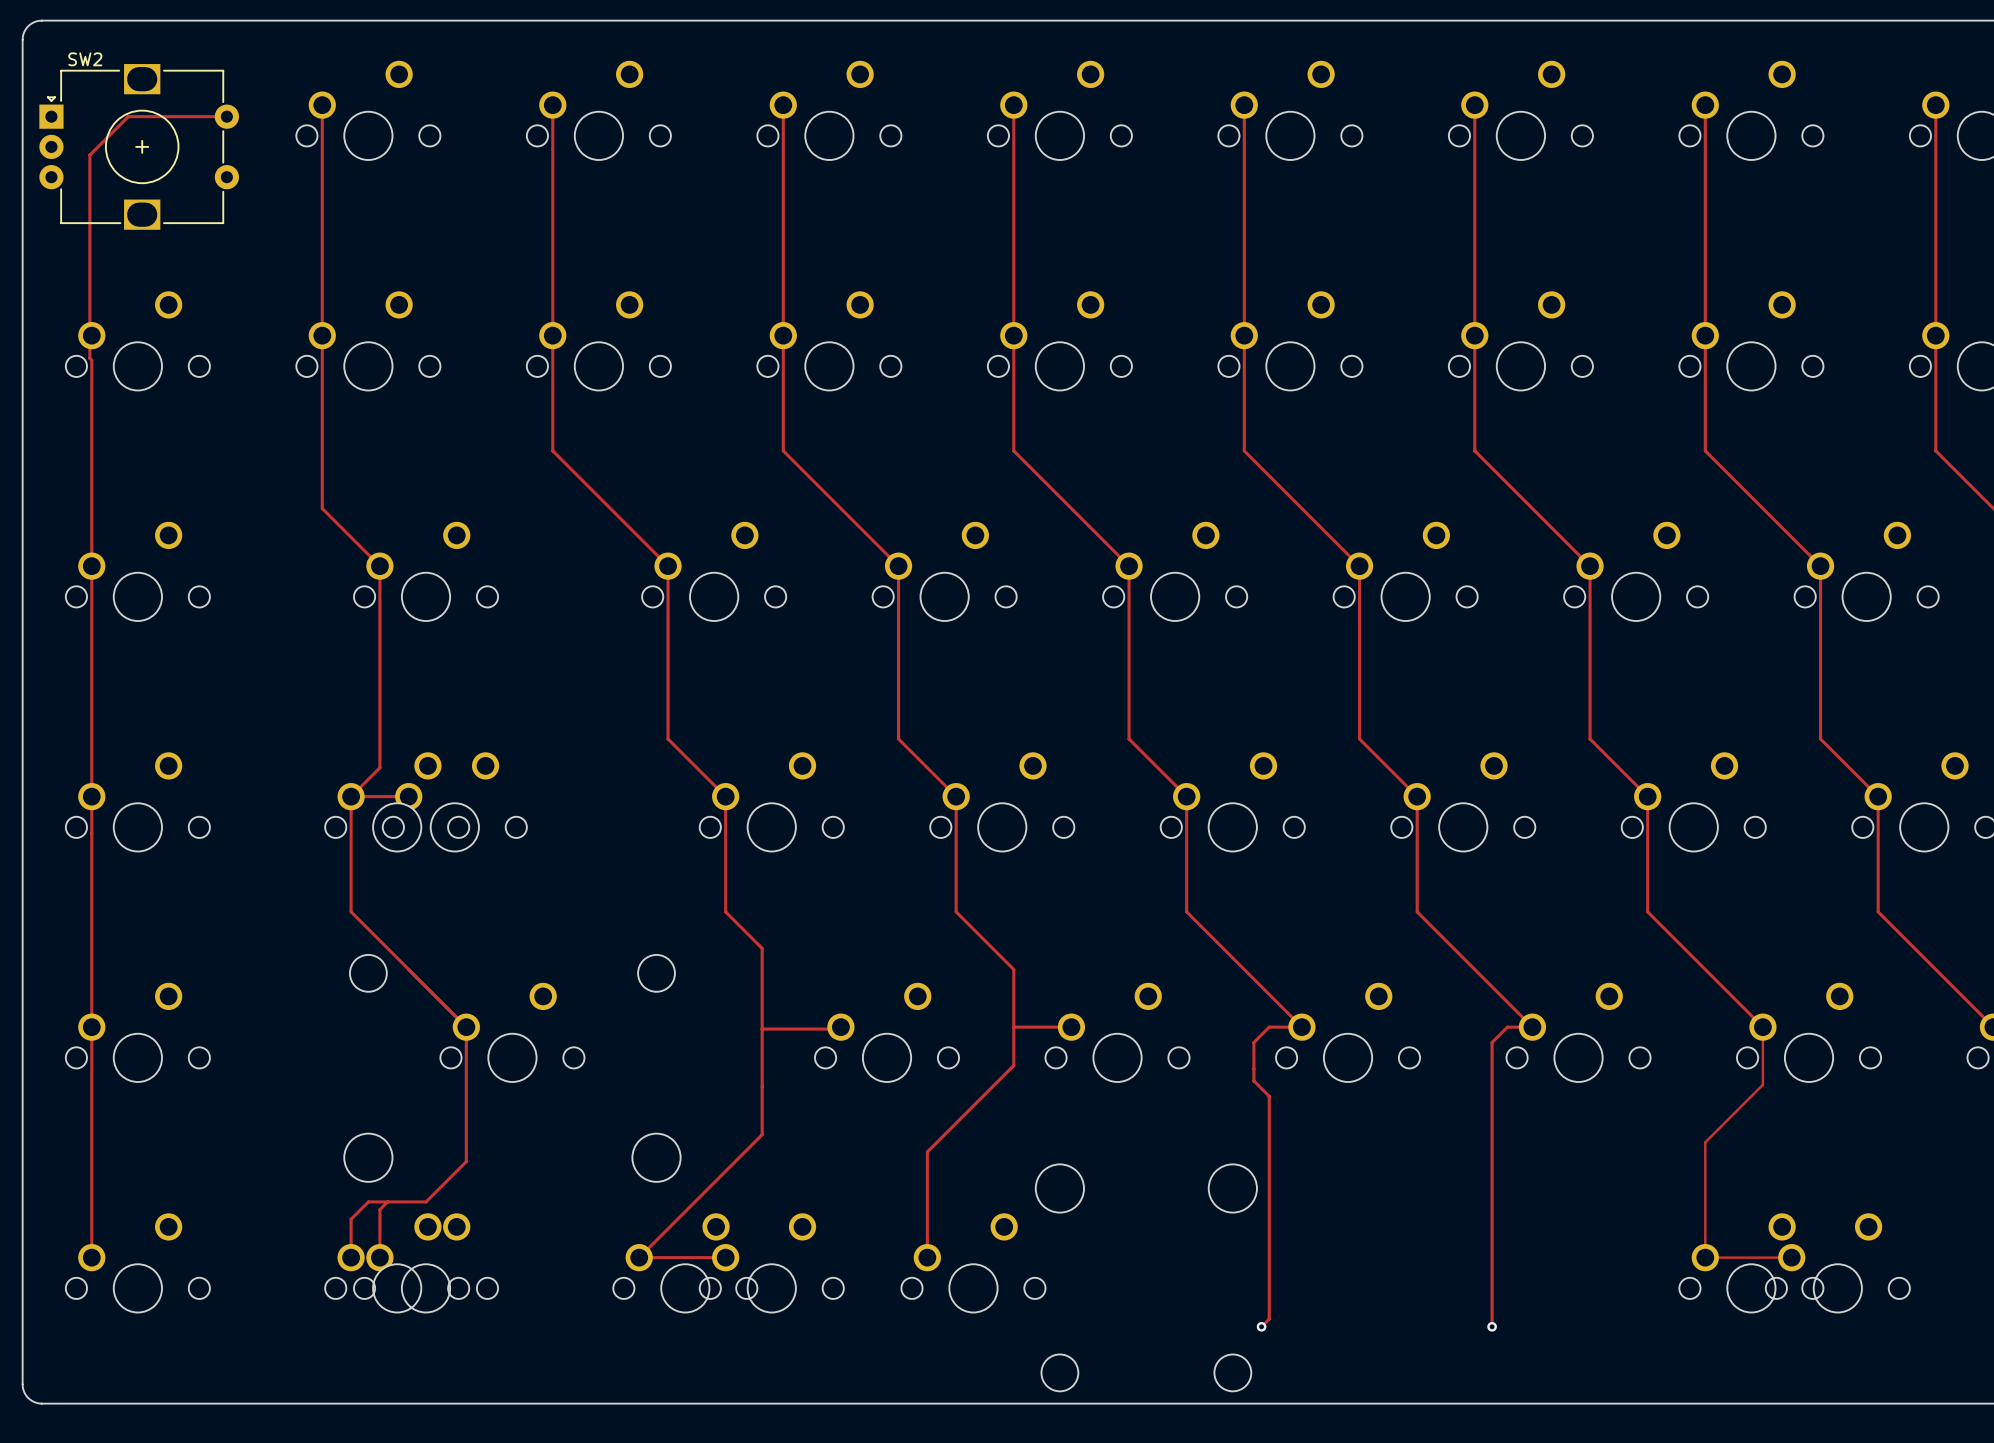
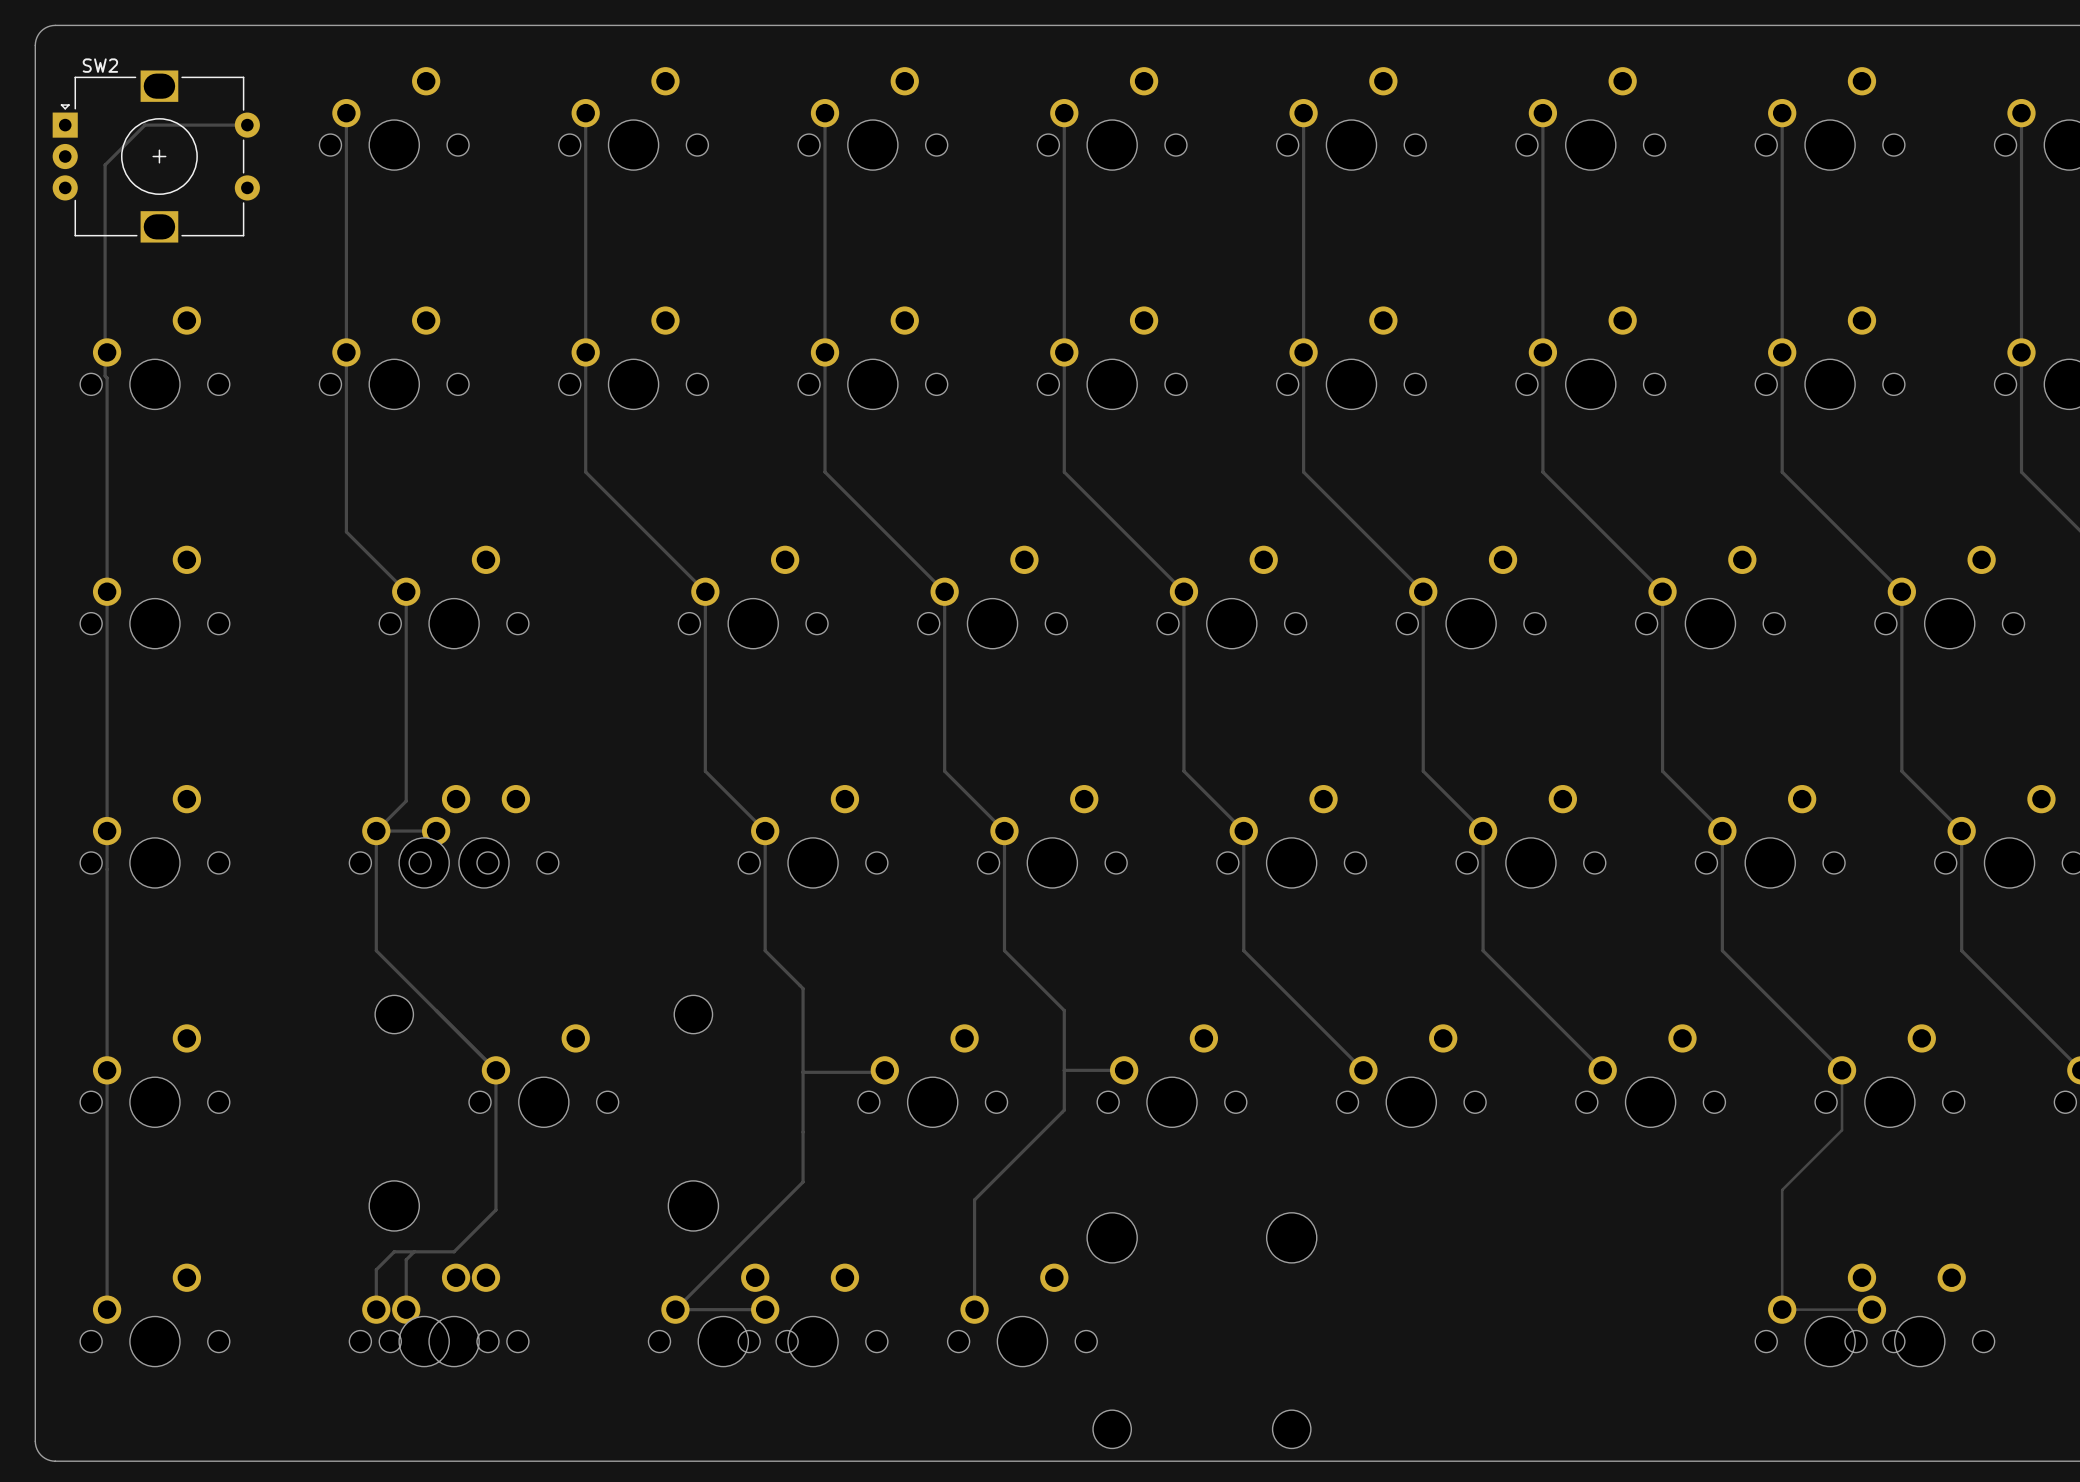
track: (1301, 1027) (1269, 1027) (1253, 1042) (1253, 1080) (1269, 1096) (1269, 1319) (1261, 1326) -> none
track: (1532, 1027) (1507, 1027) (1492, 1042) (1492, 1326) -> none
via: (1261, 1326) -> none
via: (1492, 1326) -> none

